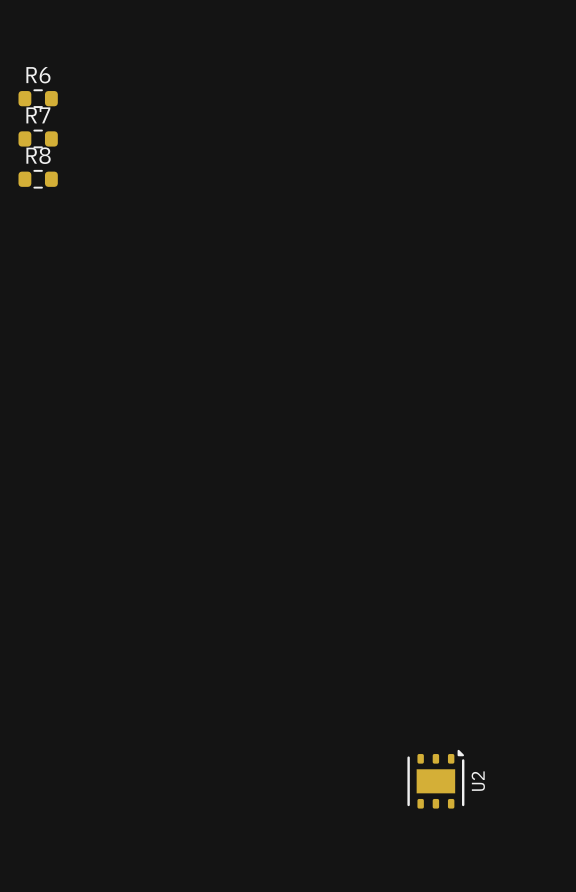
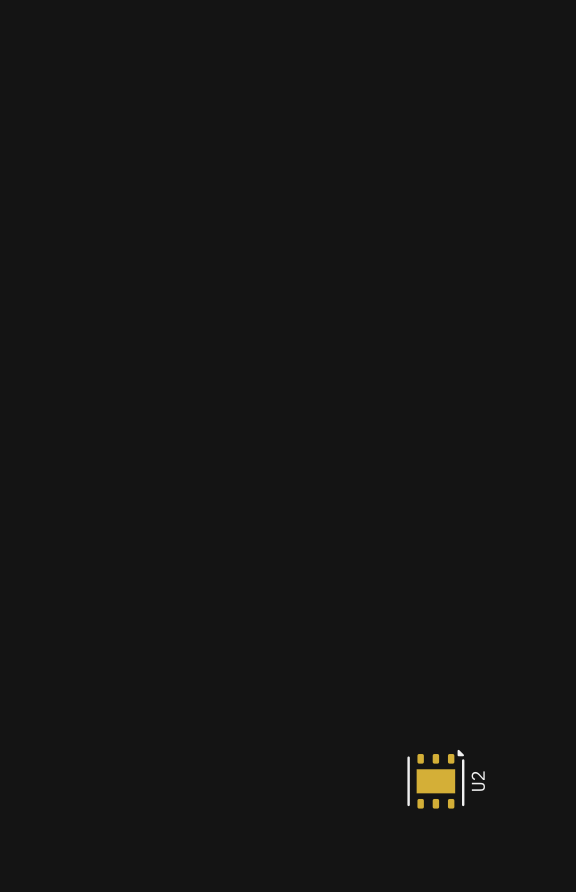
R6: (38, 98) -> none
R7: (38, 138) -> none
R8: (38, 179) -> none

